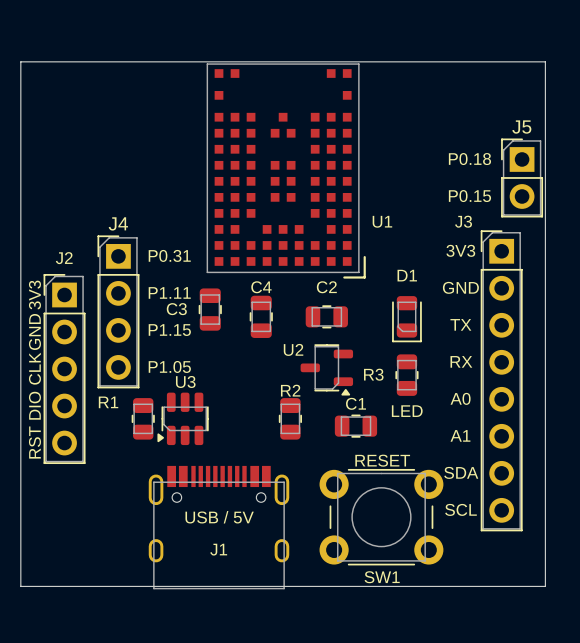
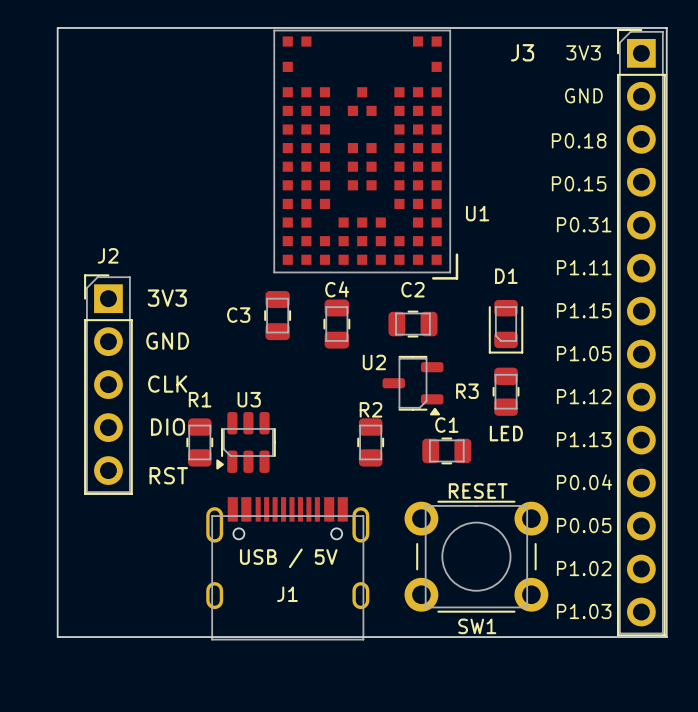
J5: (522, 177) -> none
J3 name position: J3 (463, 221) -> J3 (522, 52)
J3 footprint: [480, 230, 523, 532] -> [617, 28, 666, 637]
text position: 3V3 (460, 250) -> 3V3 (583, 52)
text position: P0.31 (169, 255) -> P0.31 (584, 224)
text position: GND (460, 287) -> GND (583, 95)
text position: P1.11 (169, 292) -> P1.11 (584, 267)
text rotation: 0° (34, 295) -> 90° clockwise (167, 298)
text position: 3V3 (34, 295) -> 3V3 (167, 298)
J4: (118, 311) -> none
text: TX (460, 324) -> none
text position: P1.15 (169, 330) -> P1.15 (584, 310)
text rotation: 0° (34, 331) -> 90° clockwise (167, 341)
text position: GND (34, 331) -> GND (167, 341)
text: RX (461, 361) -> none
text position: P1.05 (169, 366) -> P1.05 (584, 353)
text rotation: 0° (34, 368) -> 90° clockwise (167, 384)
text position: CLK (34, 368) -> CLK (167, 384)
text: none -> P1.12 (584, 396)
text: A0 (460, 398) -> none
R1 name position: R1 (108, 402) -> R1 (200, 399)
text rotation: 0° (34, 405) -> 90° clockwise (168, 427)
text position: DIO (34, 405) -> DIO (168, 427)
text: none -> P1.13 (584, 439)
text: A1 (460, 435) -> none
text rotation: 0° (34, 442) -> 90° clockwise (168, 475)
text position: RST (34, 442) -> RST (168, 475)
text: none -> P0.04 (584, 482)
text: SDA (461, 472) -> none
text: none -> P0.05 (584, 525)
text: SCL (460, 509) -> none
text: none -> P1.02 (584, 568)
text: none -> P1.03 (584, 611)

